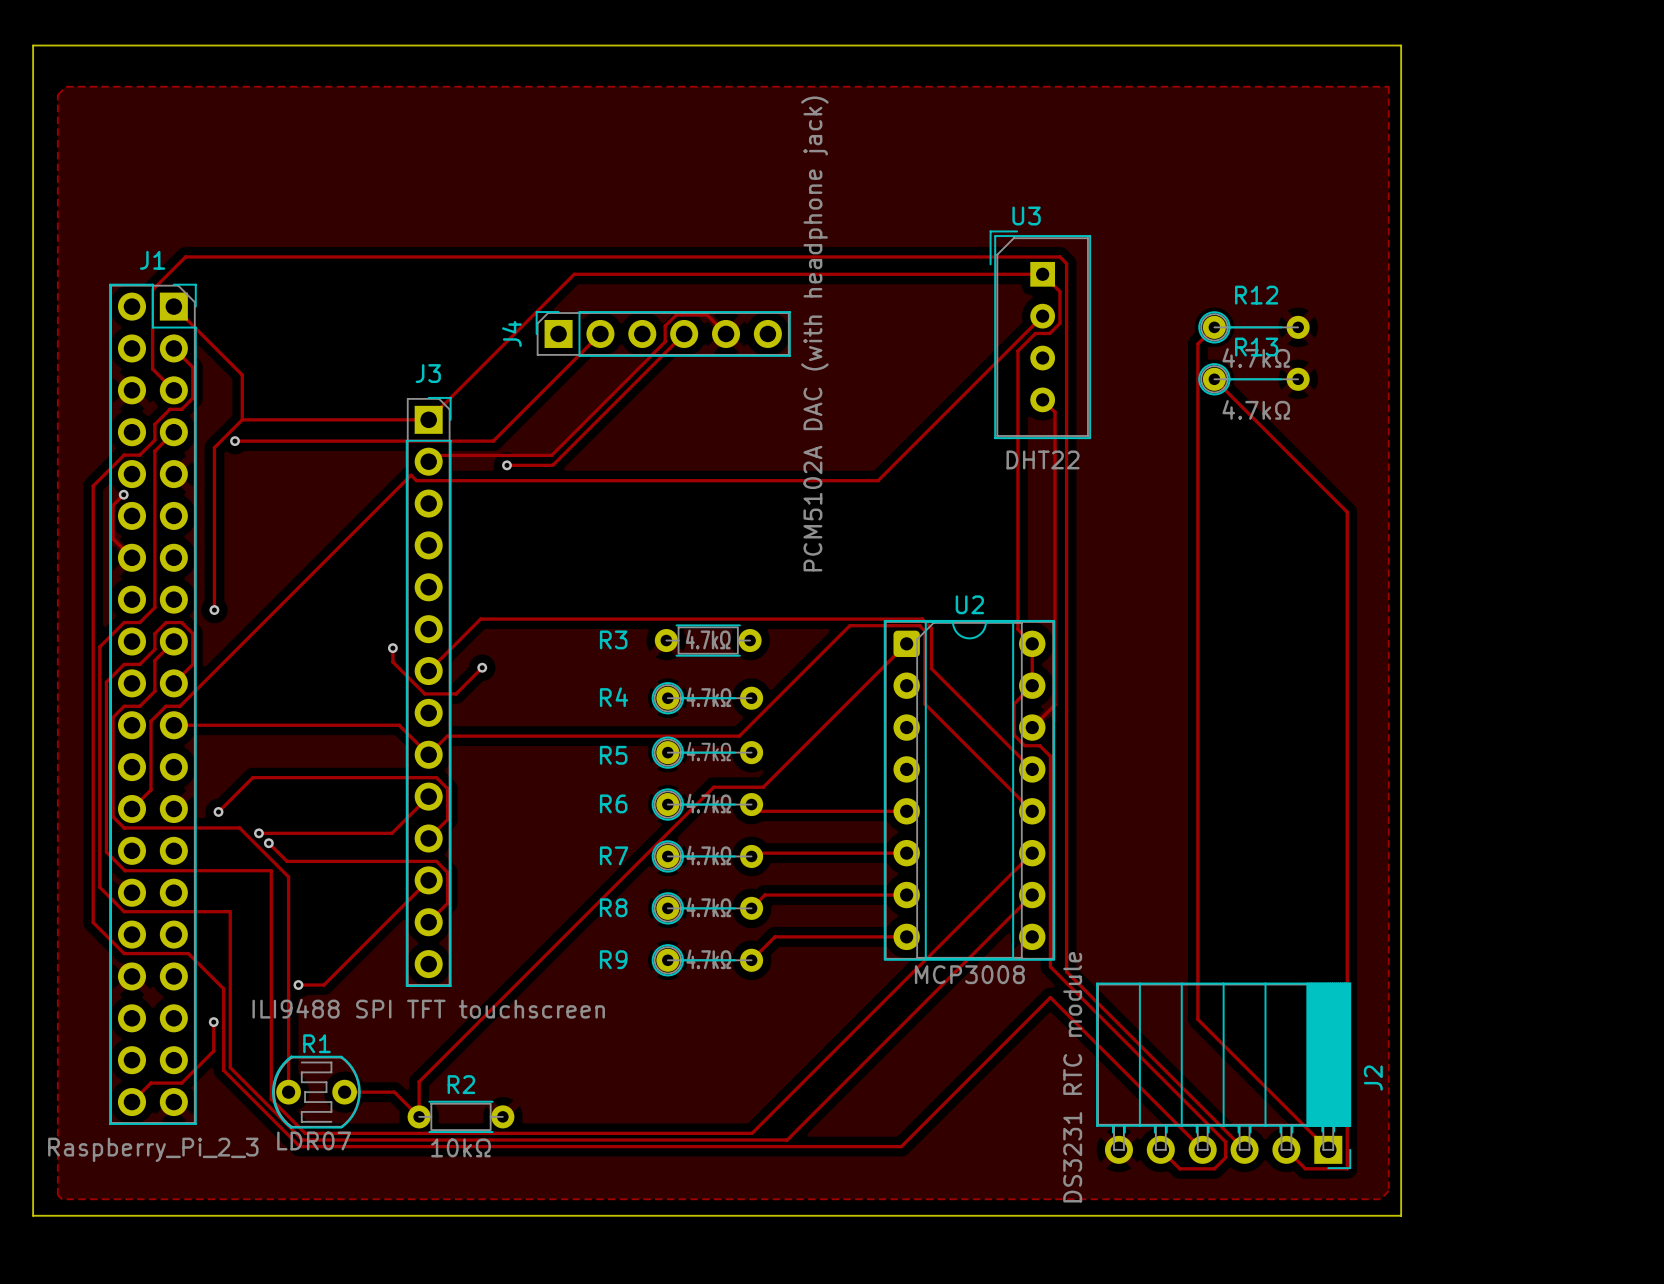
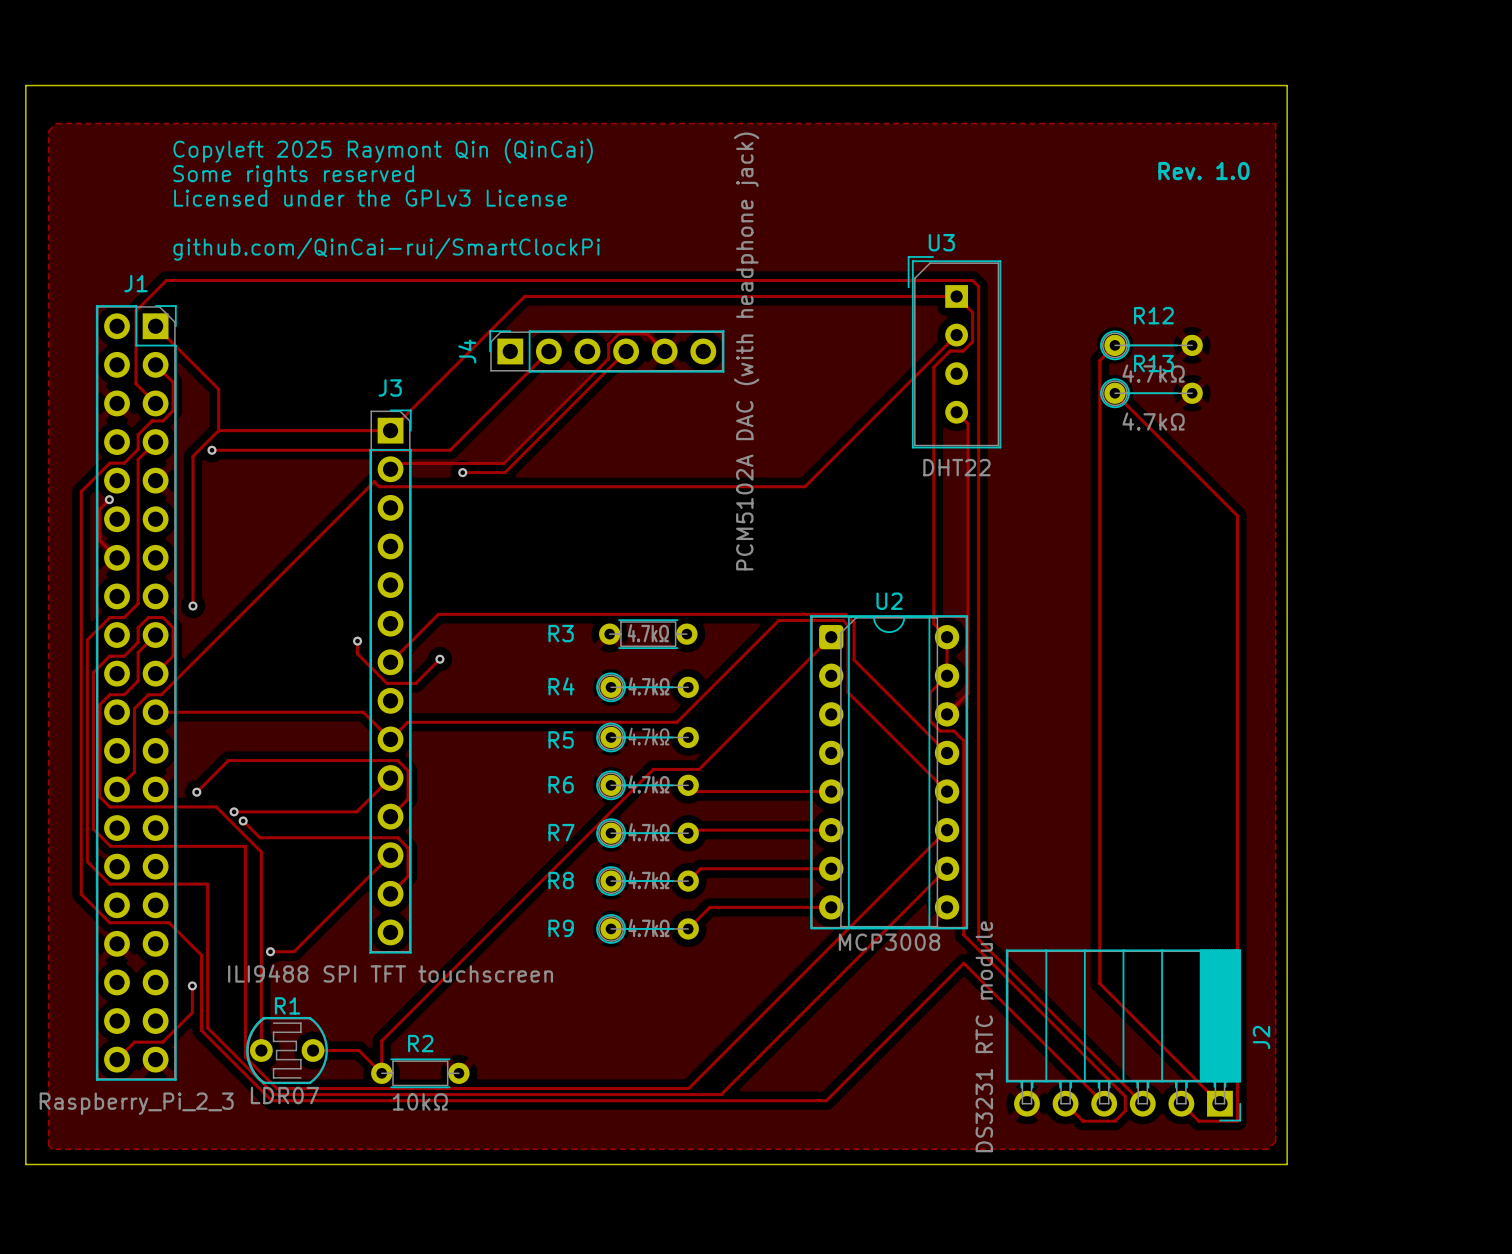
text: none -> Copyleft 2025 Raymont Qin (QinCai) (383, 150)
text: none -> Rev. 1.0 (1203, 171)
text: none -> Some rights reserved (293, 176)
text: none -> Licensed under the GPLv3 License (370, 198)
text: none -> github.com/QinCai-rui/SmartClockPi (386, 249)

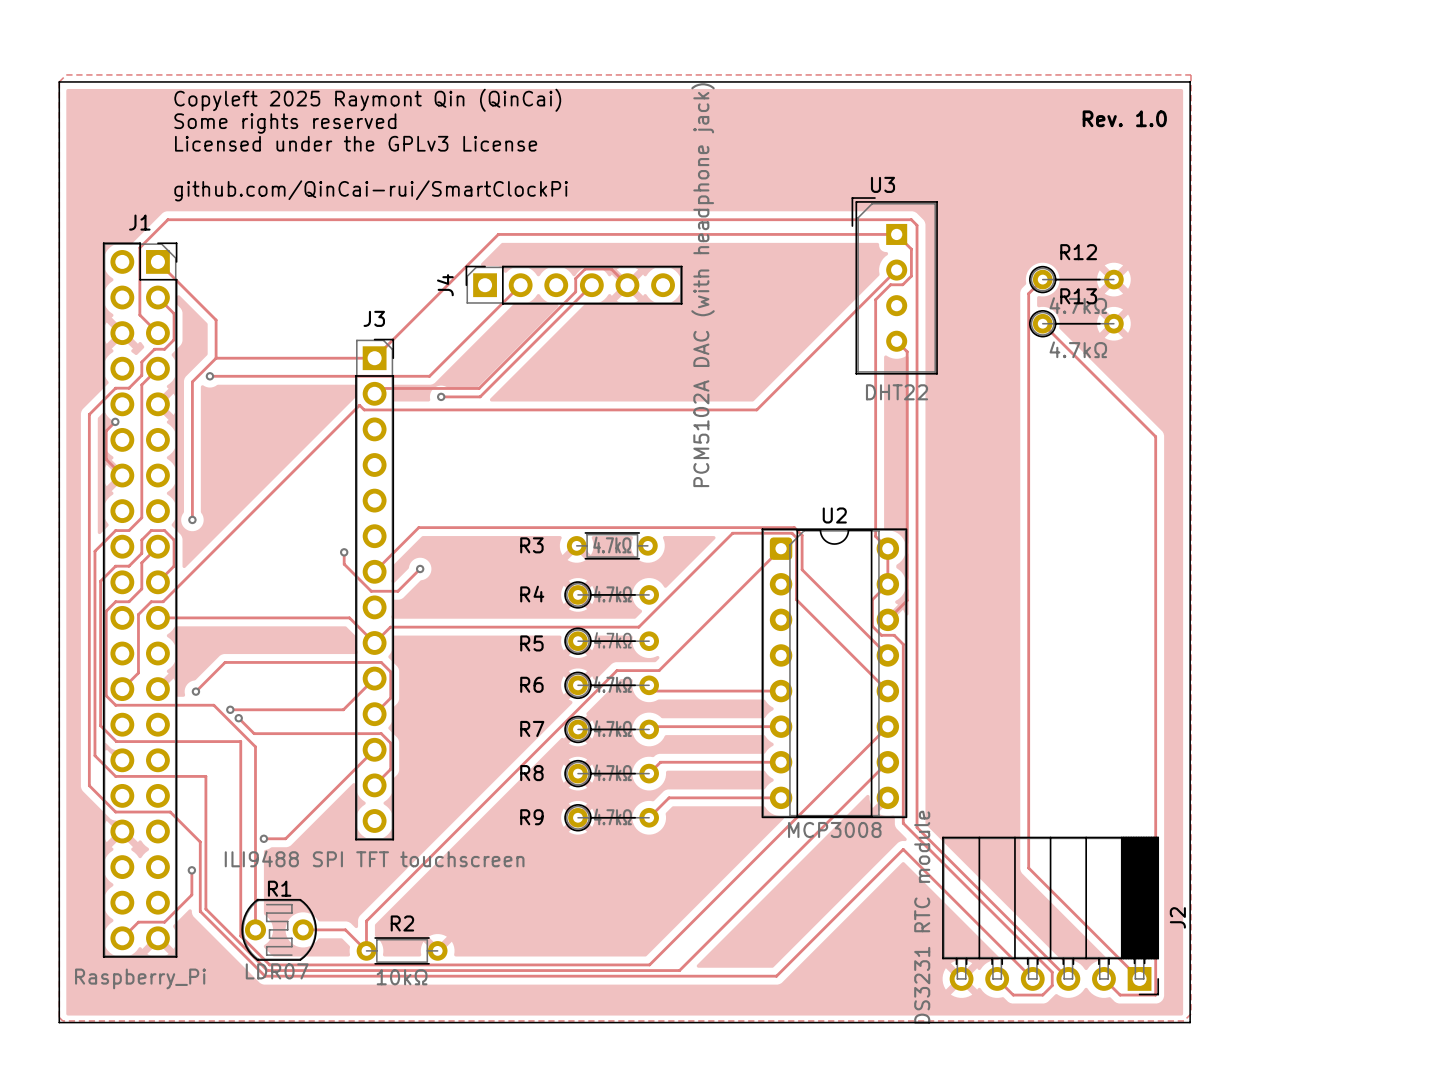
board edge: (25, 85) (1287, 85) (1287, 1164) (25, 1164) (25, 85) -> (59, 81) (59, 1022) (1190, 1022) (1190, 81) (59, 81)
J1 value: Raspberry_Pi_2_3 (136, 1103) -> Raspberry_Pi (140, 978)

